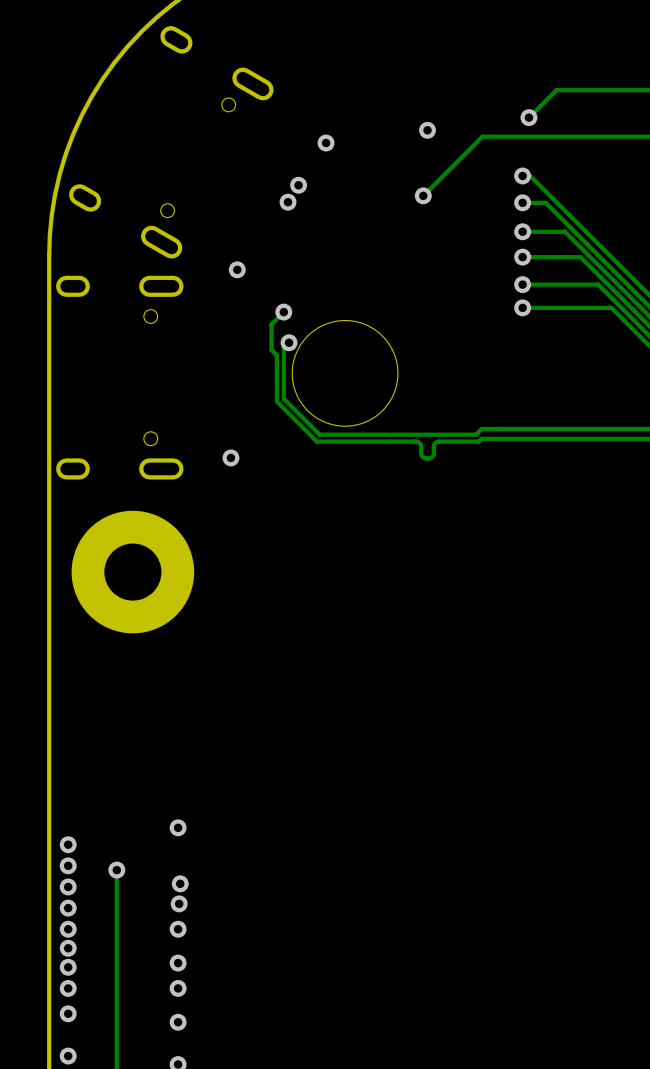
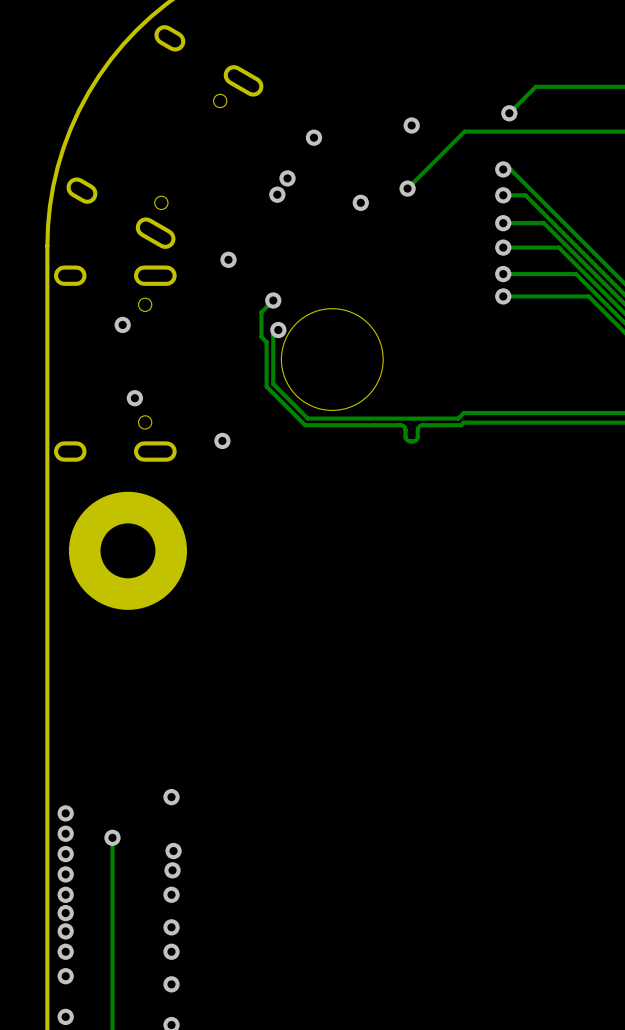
via: none -> (360, 202)
via: none -> (122, 324)
via: none -> (134, 398)

